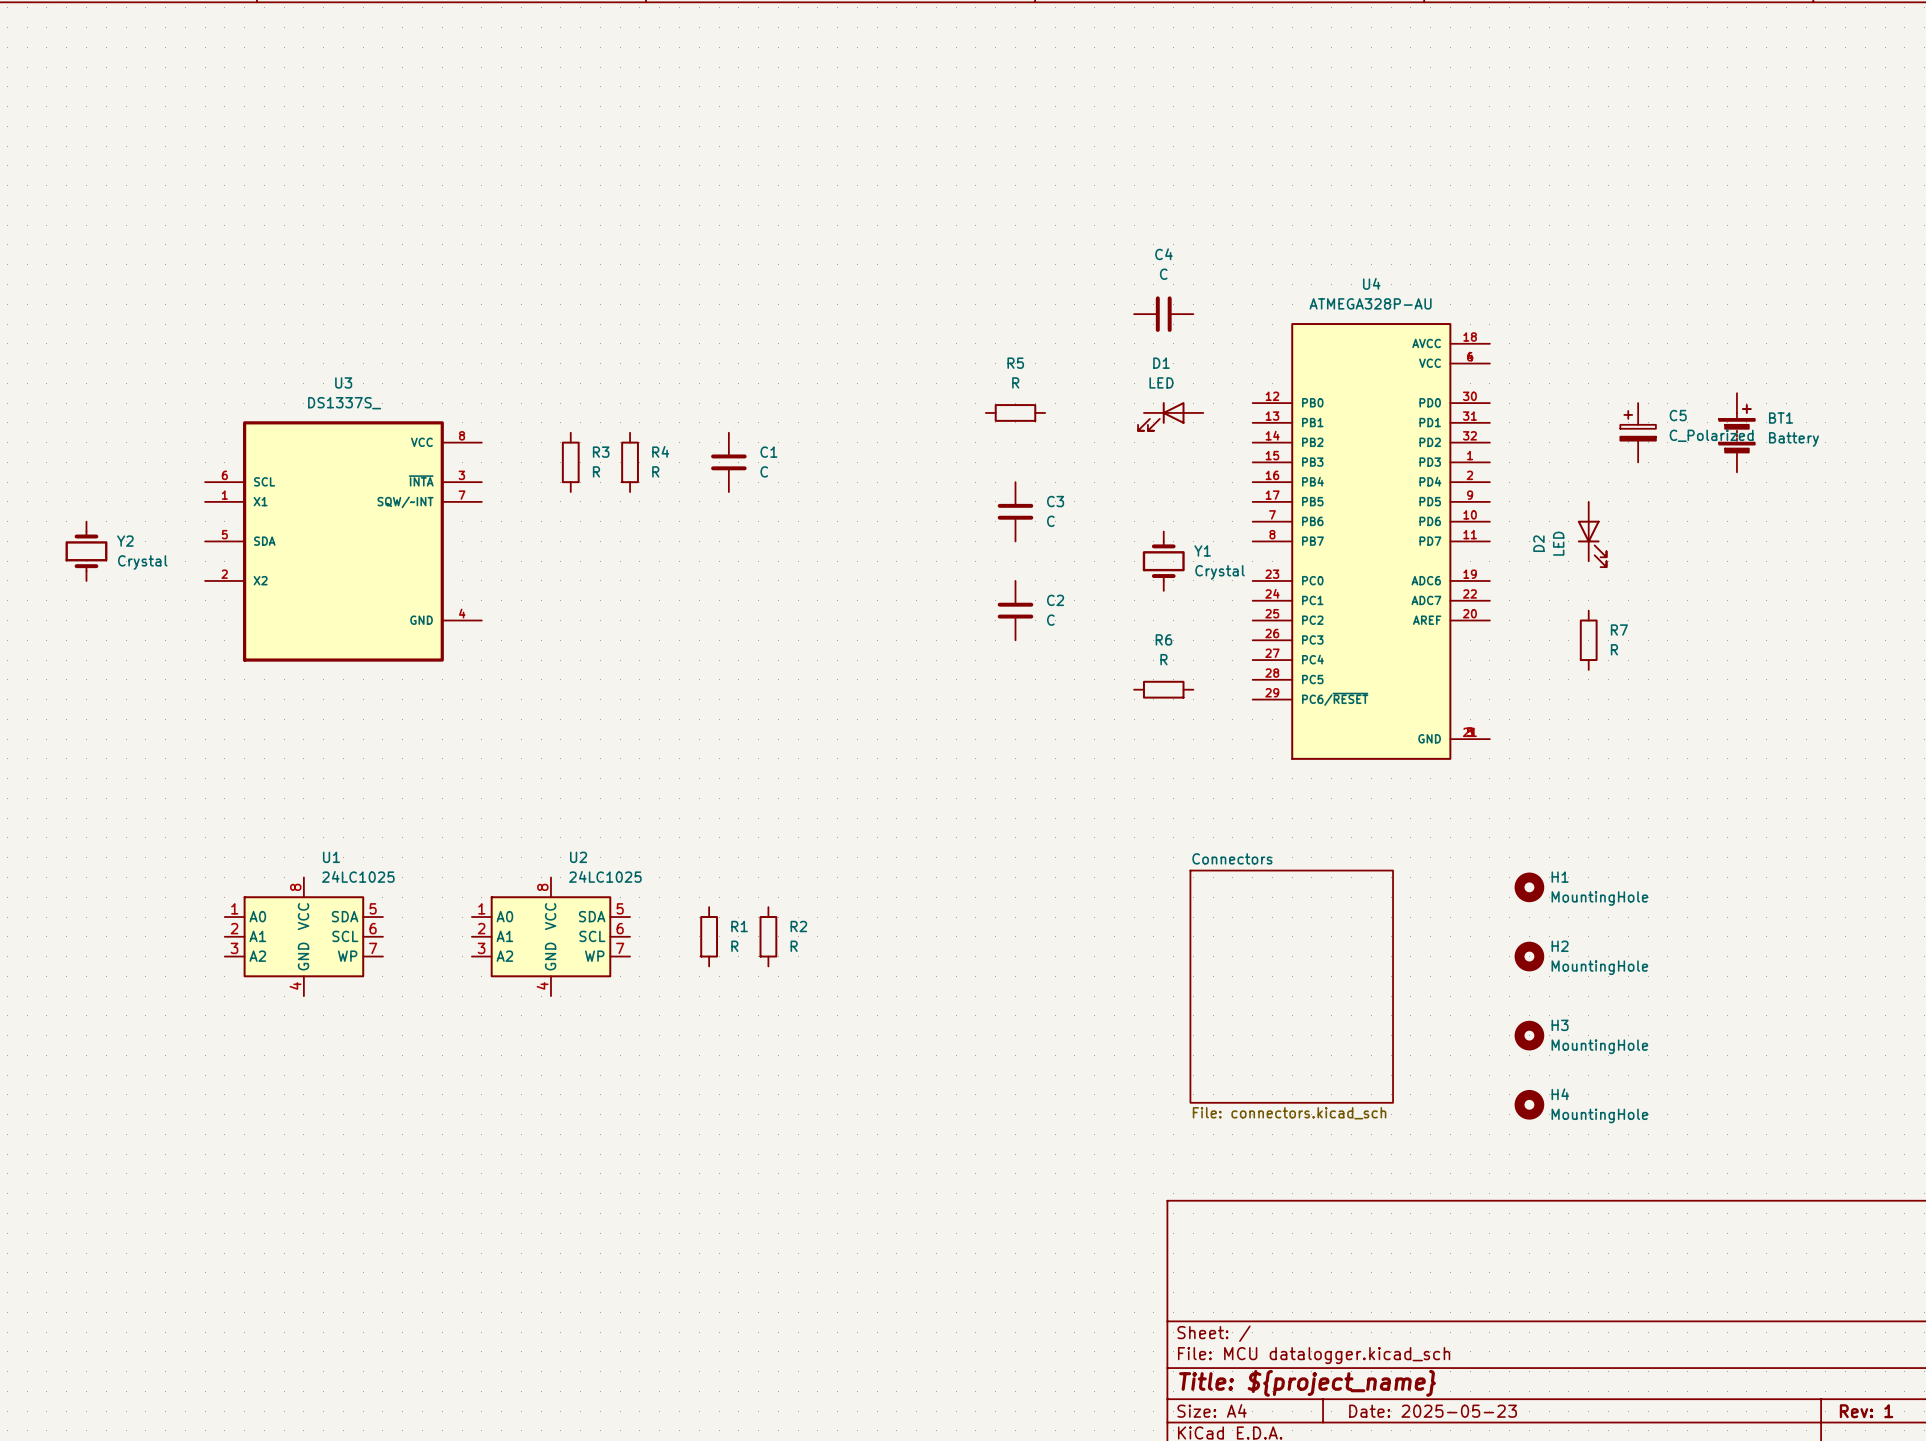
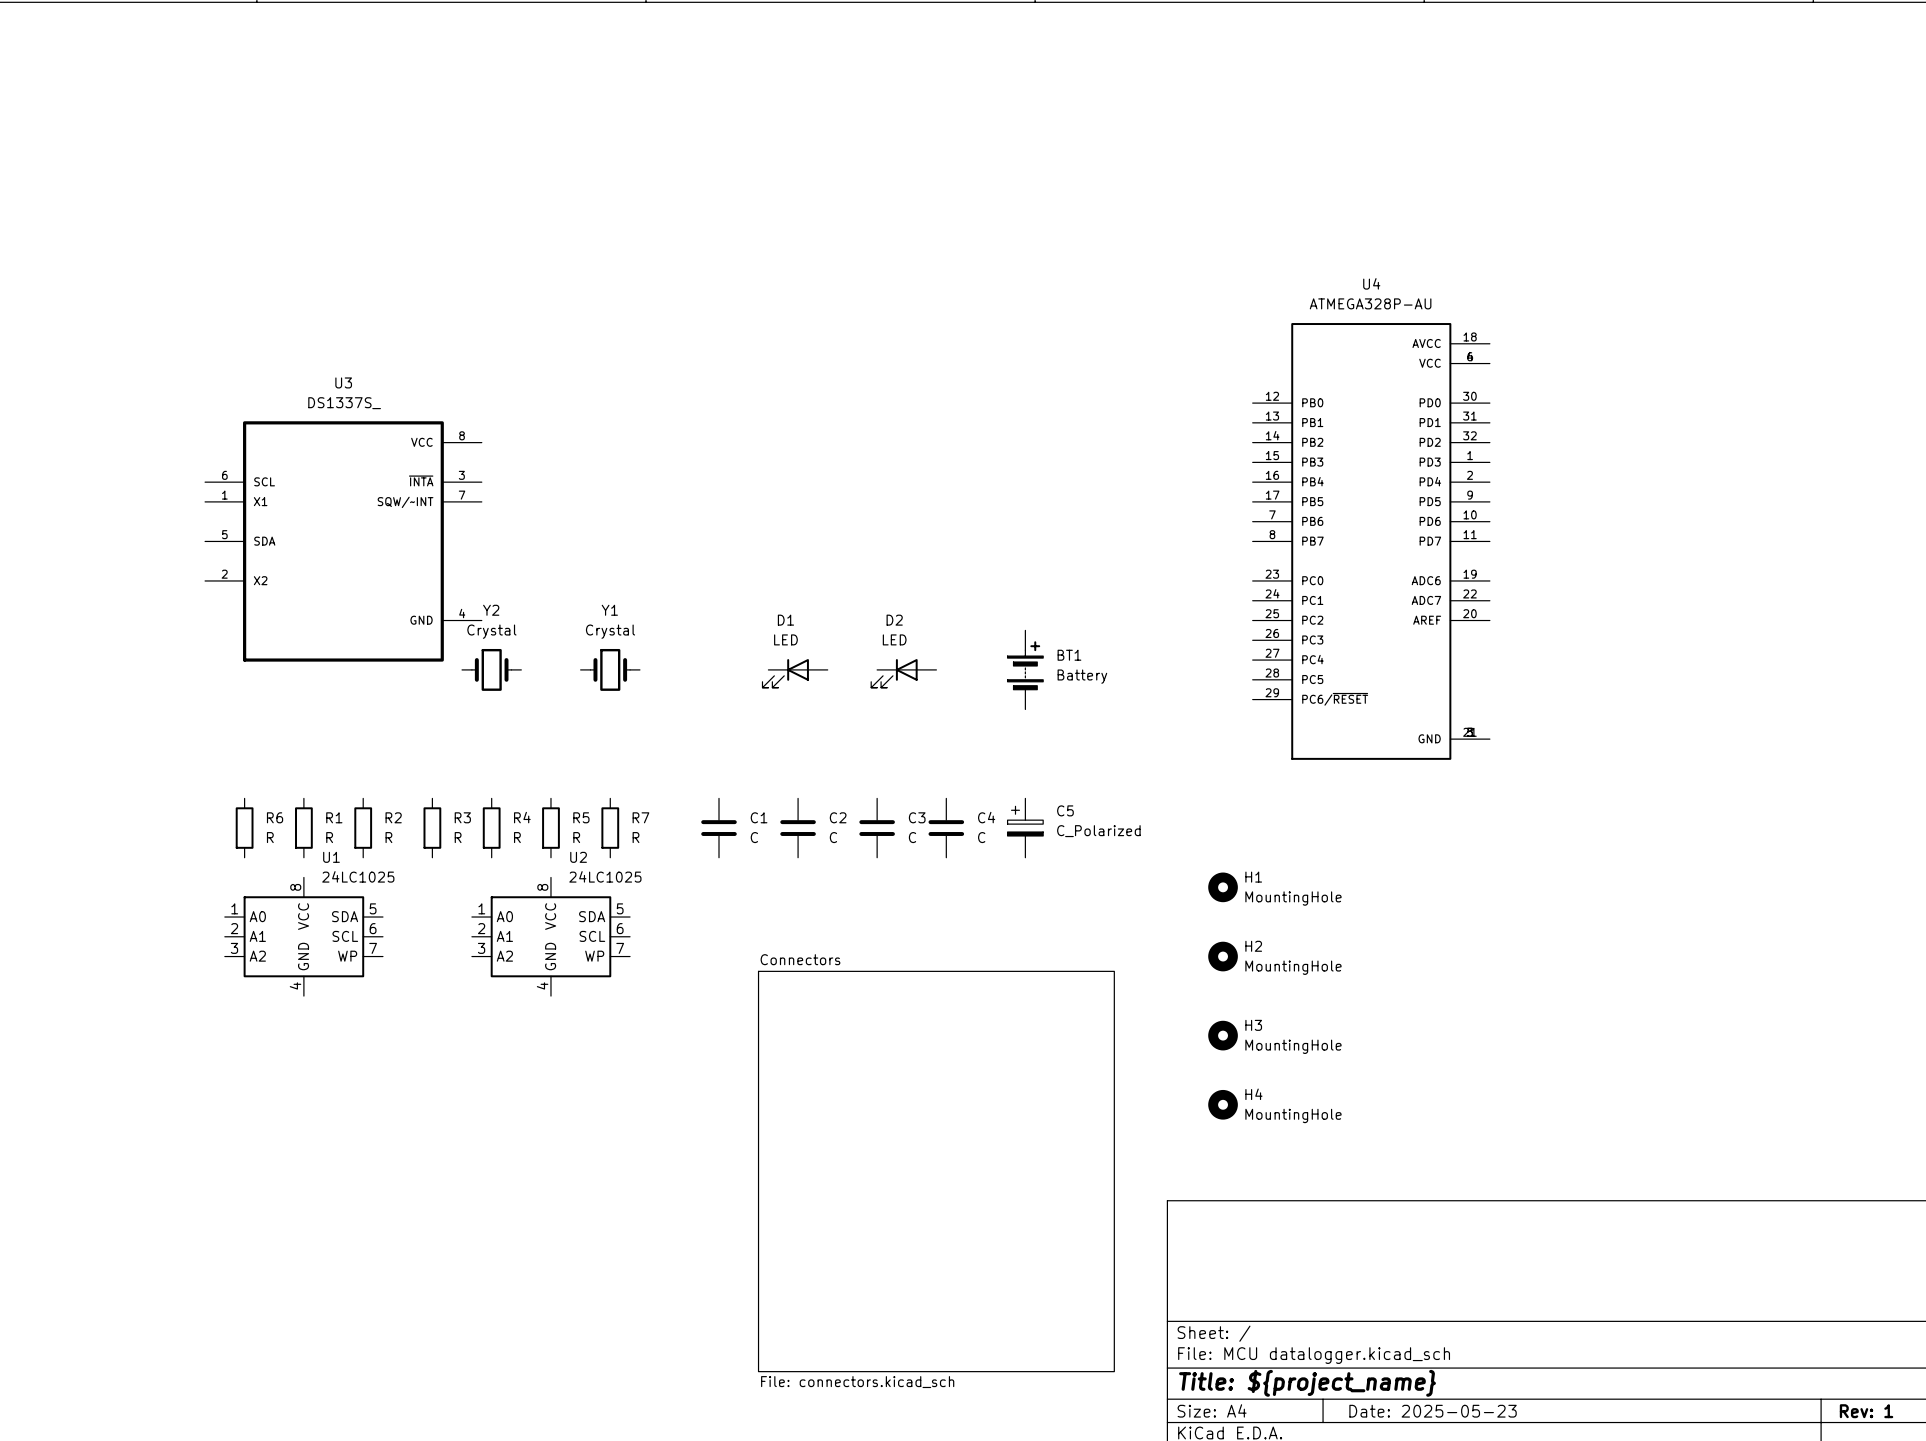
C4 name position: C4 (1163, 254) -> C4 (986, 817)
C4 rotation: 0° (1163, 314) -> 90° clockwise (946, 828)
C4 position: (1163, 314) -> (946, 828)
R5 name position: R5 (1015, 363) -> R5 (581, 817)
R5 rotation: 0° (1015, 412) -> 90° clockwise (550, 828)
R5 position: (1015, 412) -> (550, 828)
D1 position: (1170, 416) -> (795, 673)
C5 position: (1638, 432) -> (1025, 828)
BT1 position: (1736, 432) -> (1025, 669)
R3 position: (570, 462) -> (432, 828)
R4 position: (630, 462) -> (491, 828)
C1 position: (728, 462) -> (719, 828)
C3 position: (1015, 511) -> (877, 828)
D2 position: (1592, 534) -> (903, 673)
Y2 name position: Y2 (125, 541) -> Y2 (491, 610)
D2 rotation: 0° (1592, 543) -> 90° clockwise (894, 673)
Y1 name position: Y1 (1202, 550) -> Y1 (609, 610)
Y2 rotation: 0° (86, 551) -> 90° clockwise (491, 669)
Y2 position: (86, 551) -> (491, 669)
Y1 rotation: 0° (1163, 561) -> 90° clockwise (610, 669)
Y1 position: (1163, 561) -> (610, 669)
Y2 value position: Crystal (142, 562) -> Crystal (491, 631)
Y1 value position: Crystal (1220, 572) -> Crystal (610, 631)
C2 position: (1015, 610) -> (798, 828)
R6 name position: R6 (1163, 639) -> R6 (275, 817)
R7 position: (1588, 640) -> (610, 828)
R6 rotation: 0° (1163, 689) -> 90° clockwise (244, 828)
R6 position: (1163, 689) -> (244, 828)
H1 position: (1529, 887) -> (1223, 887)
R1 position: (709, 936) -> (303, 828)
R2 position: (768, 936) -> (363, 828)
H2 position: (1529, 956) -> (1223, 956)
sheet Connectors: File: connectors.kicad_sch (1291, 986) -> none
H3 position: (1529, 1035) -> (1223, 1035)
H4 position: (1529, 1104) -> (1223, 1104)
sheet Connectors: none -> File: connectors.kicad_sch (936, 1171)

